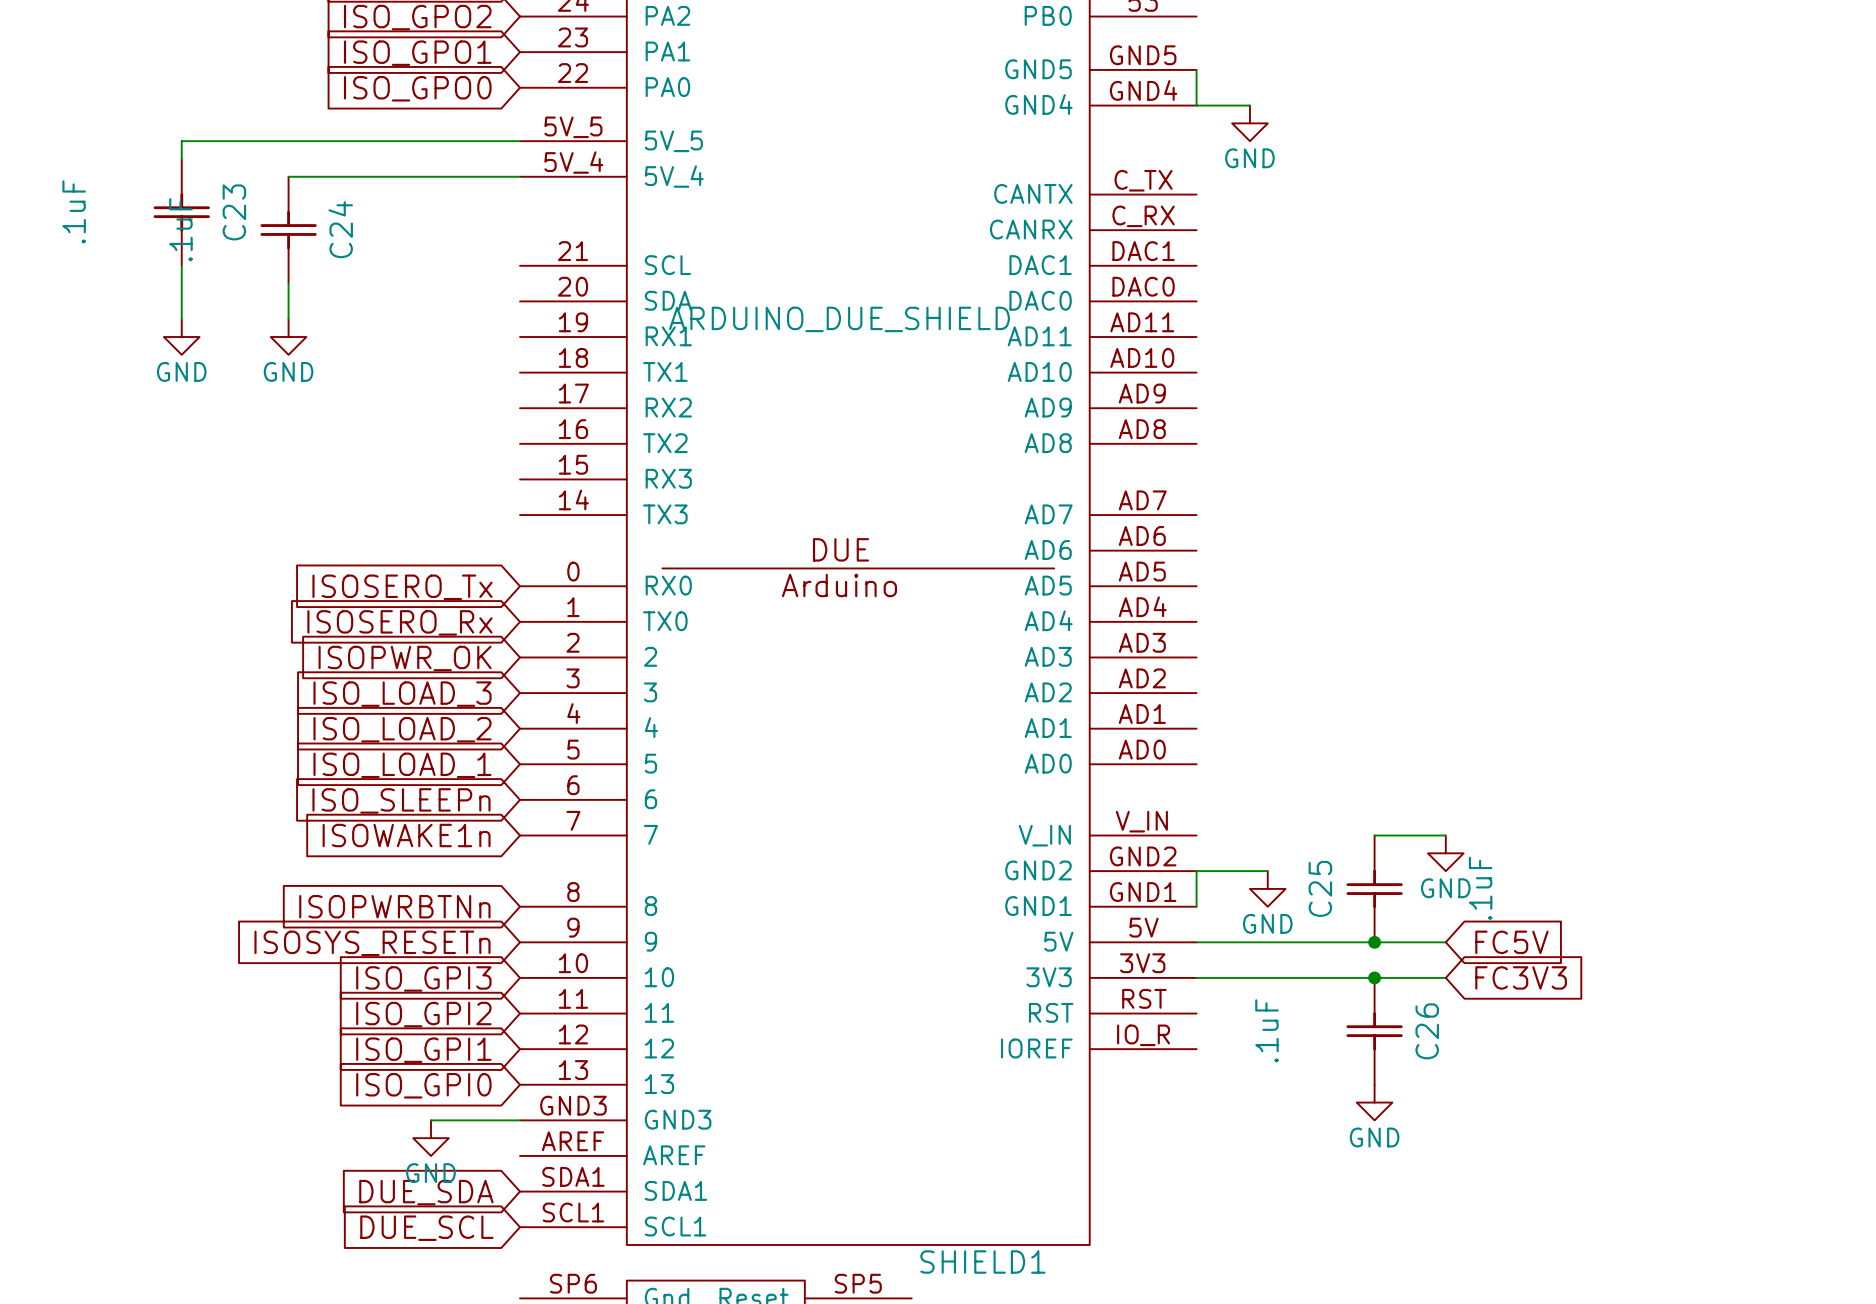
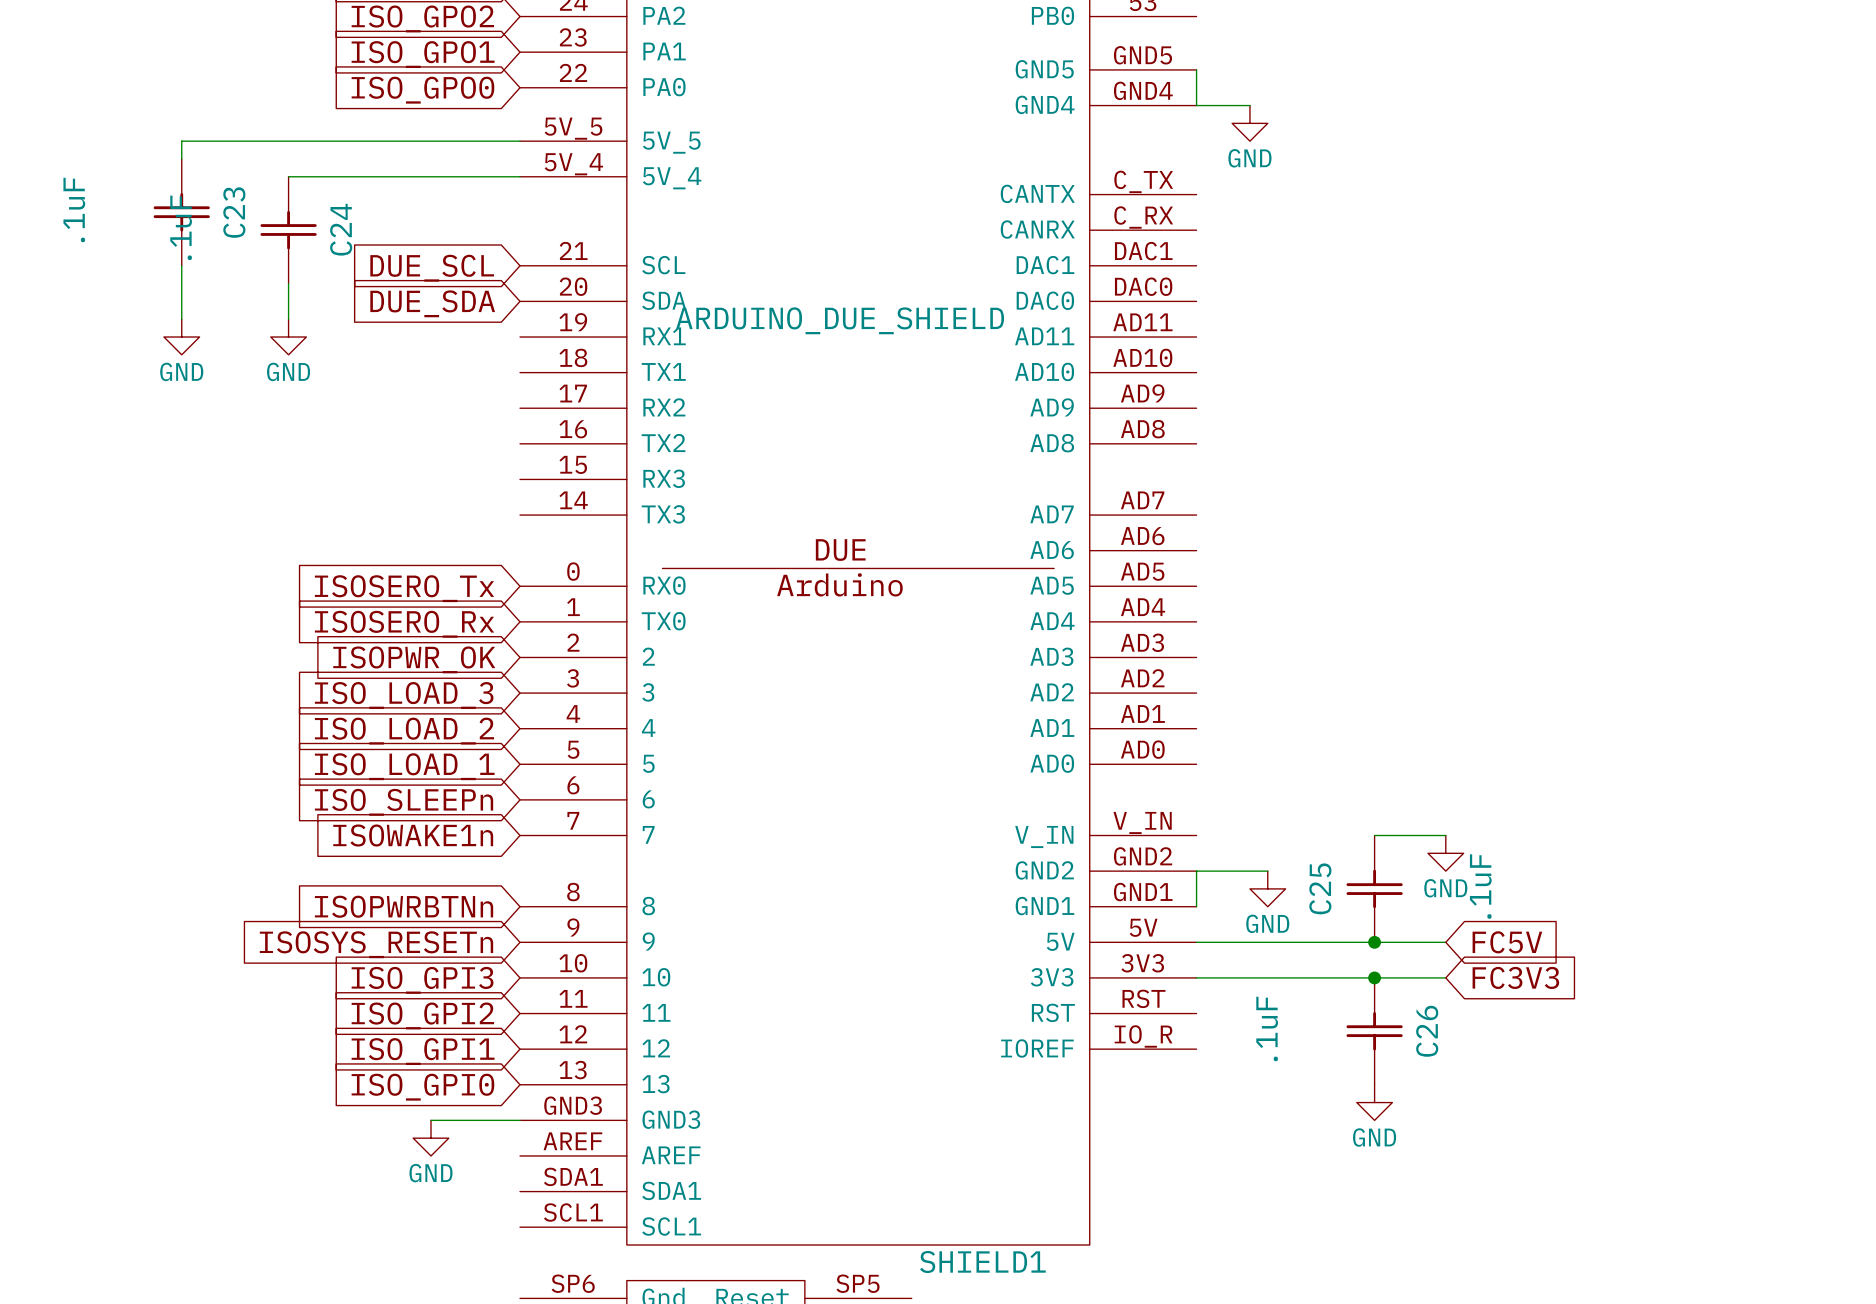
global label: none -> DUE_SCL (432, 268)
global label: none -> DUE_SDA (432, 303)
global label: DUE_SDA (426, 1192) -> none
global label: DUE_SCL (426, 1228) -> none

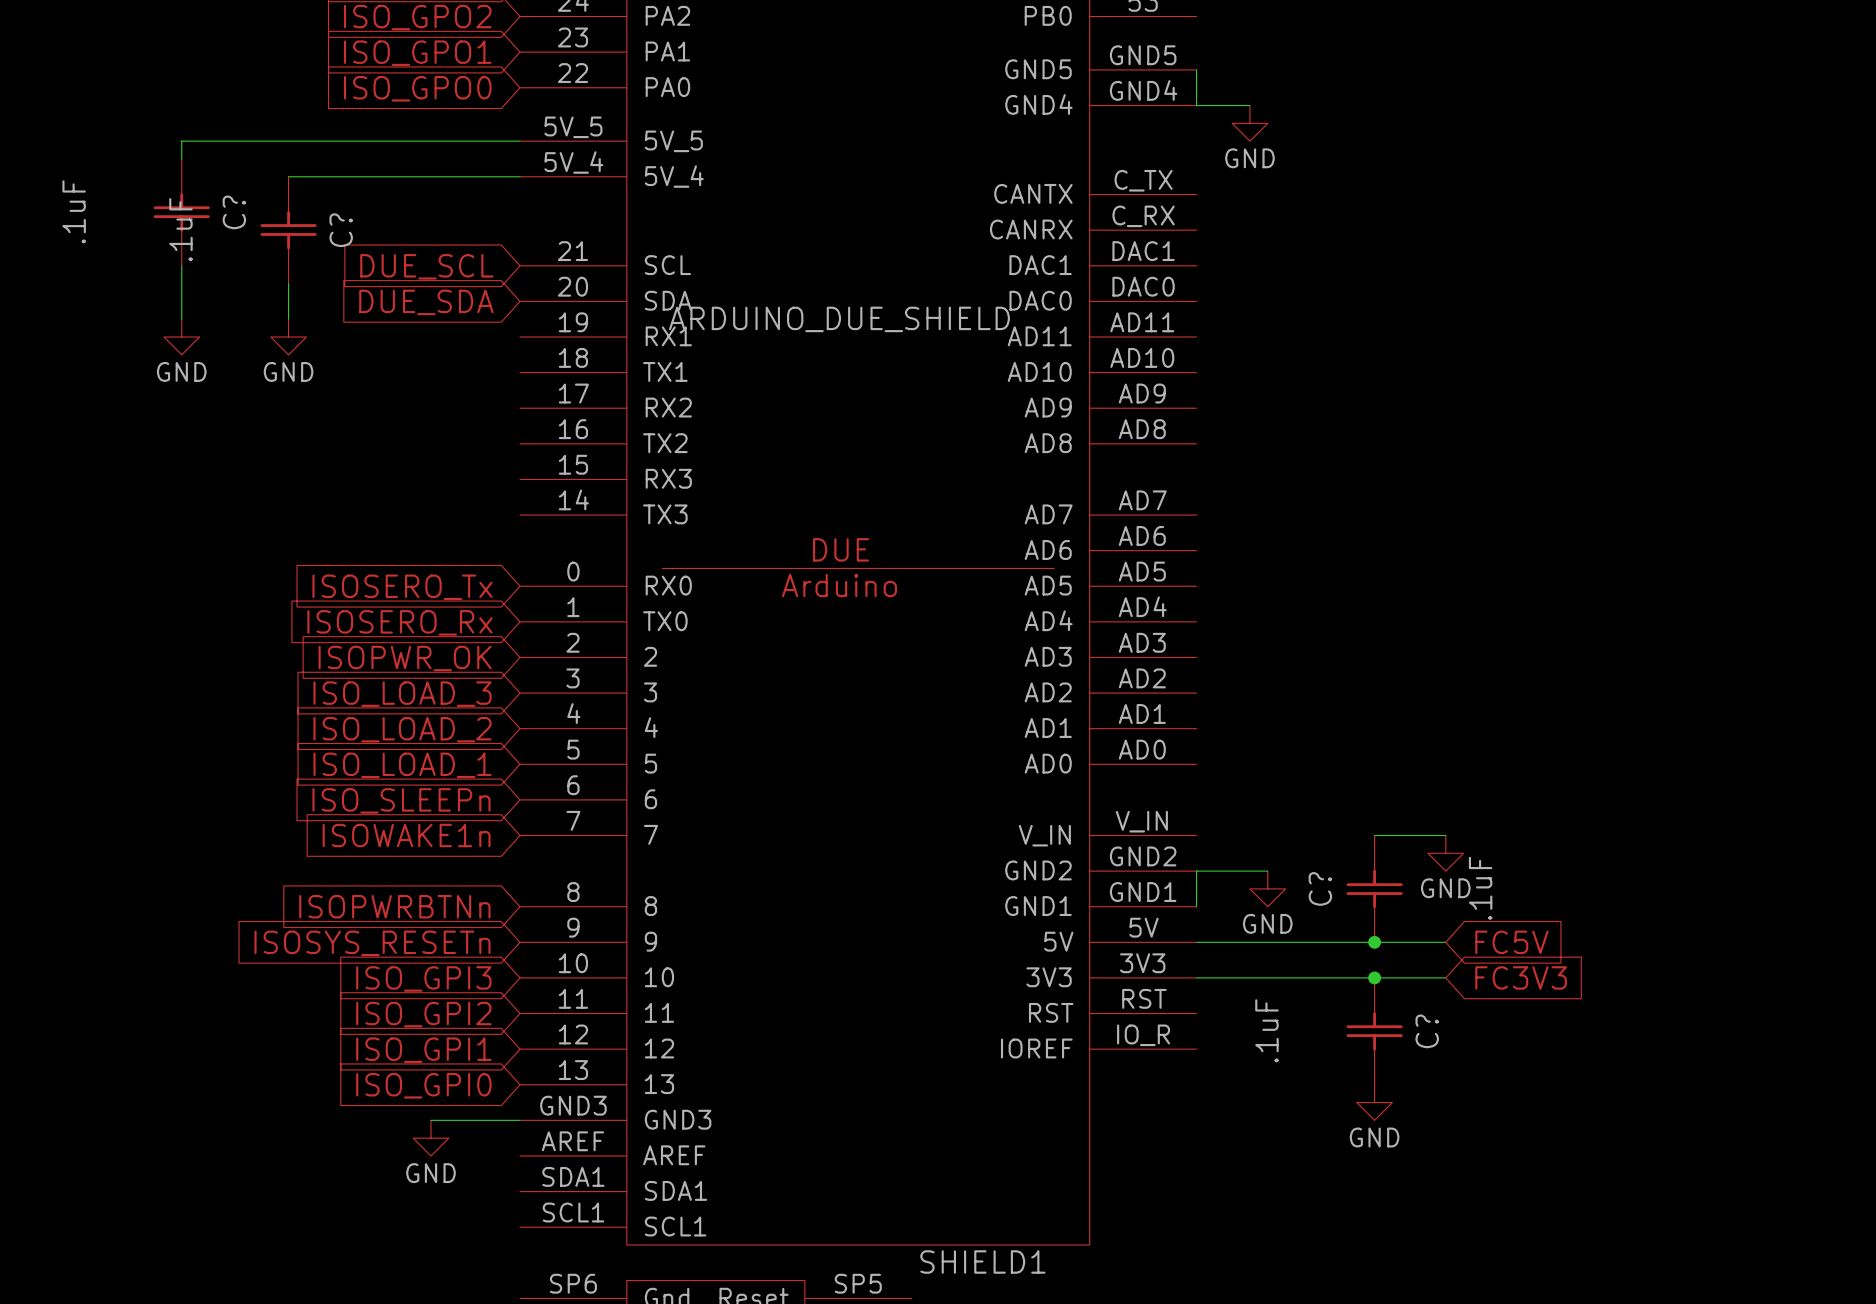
C23 name: C23 (234, 212) -> C? (234, 212)
C24 name: C24 (341, 229) -> C? (341, 230)
C25 name: C25 (1320, 888) -> C? (1320, 888)
C26 name: C26 (1427, 1031) -> C? (1427, 1031)

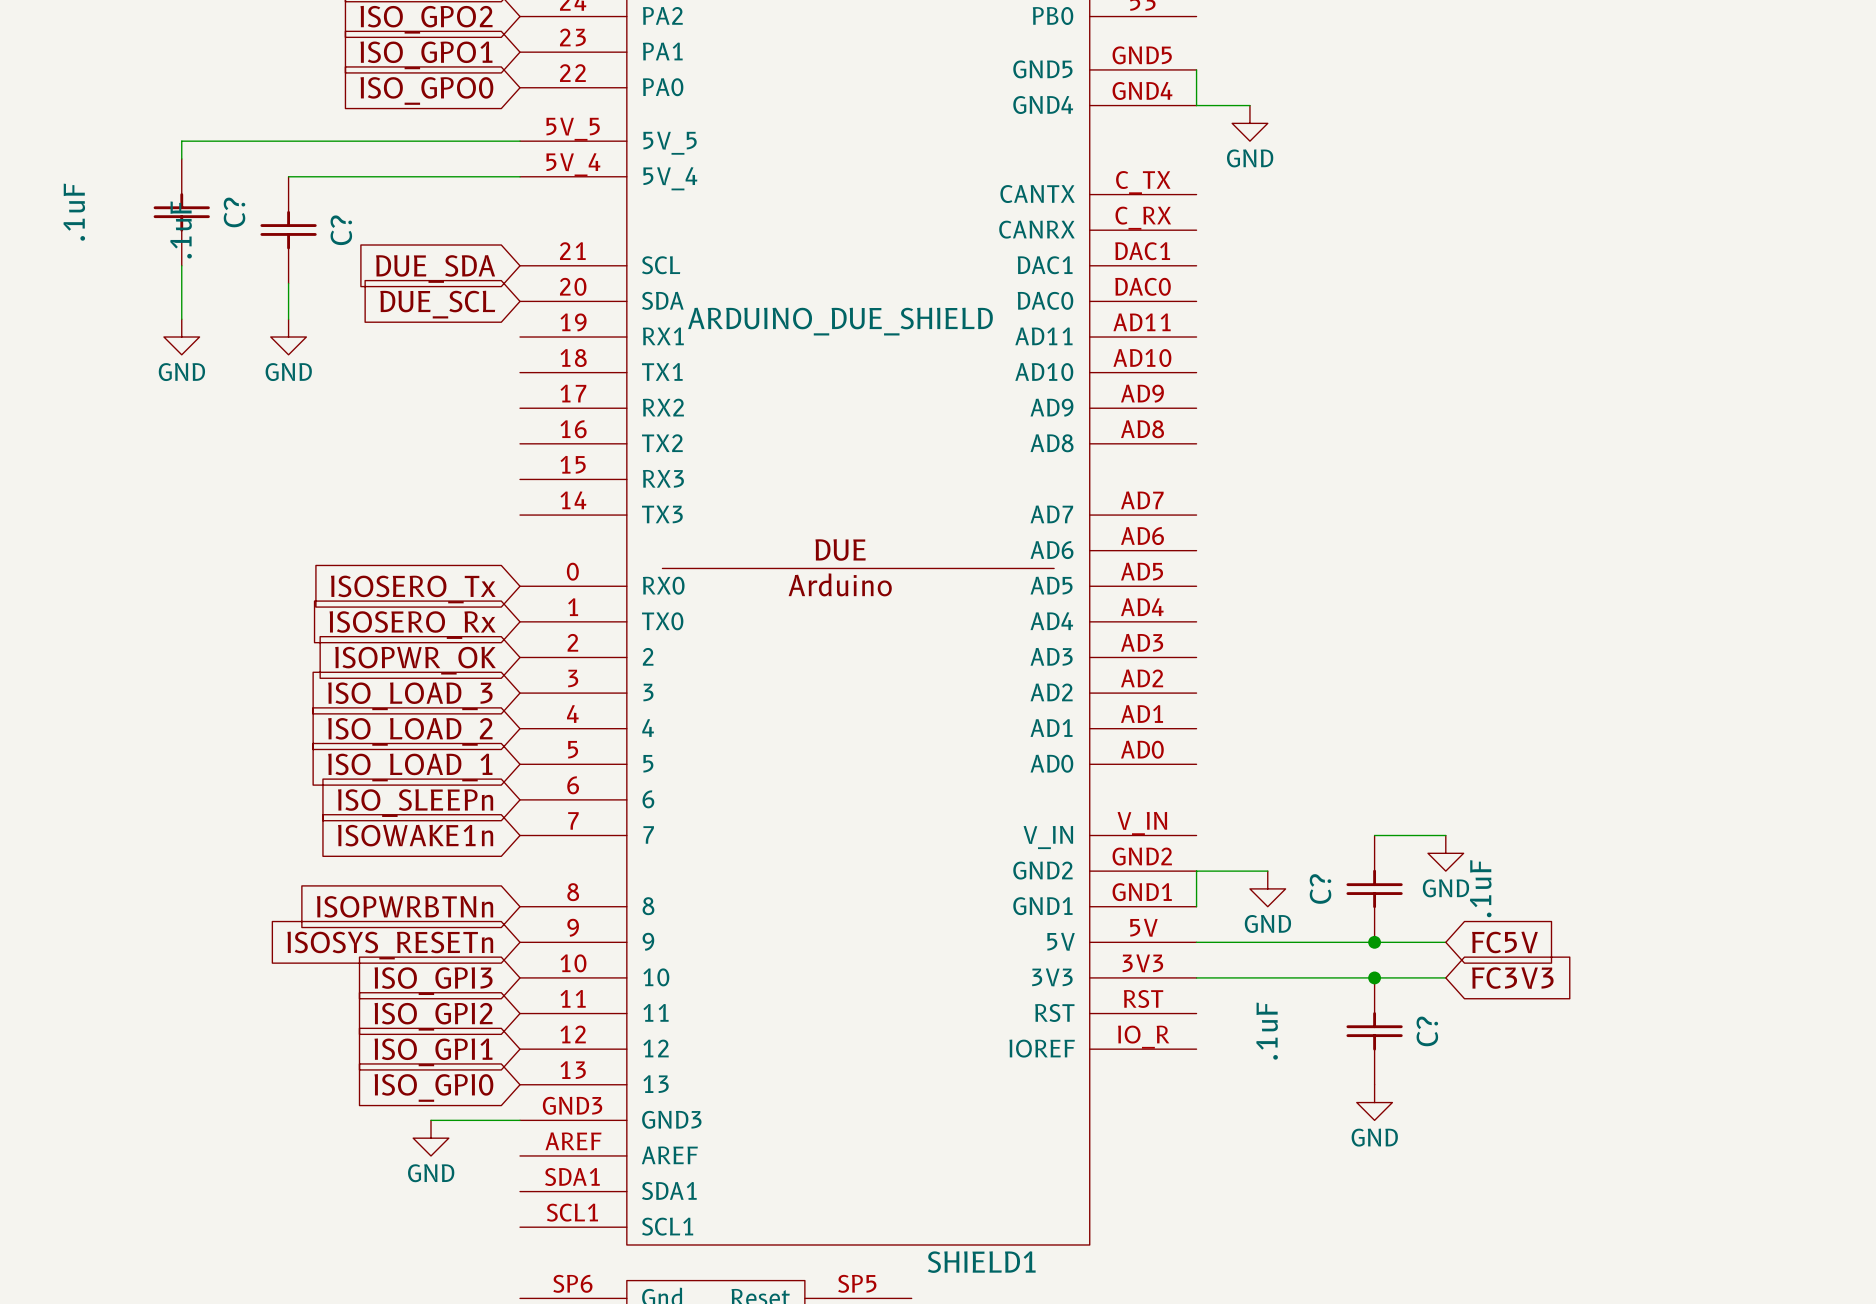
global label: DUE_SCL (426, 266) -> DUE_SDA (435, 268)
global label: DUE_SDA (426, 302) -> DUE_SCL (437, 304)

